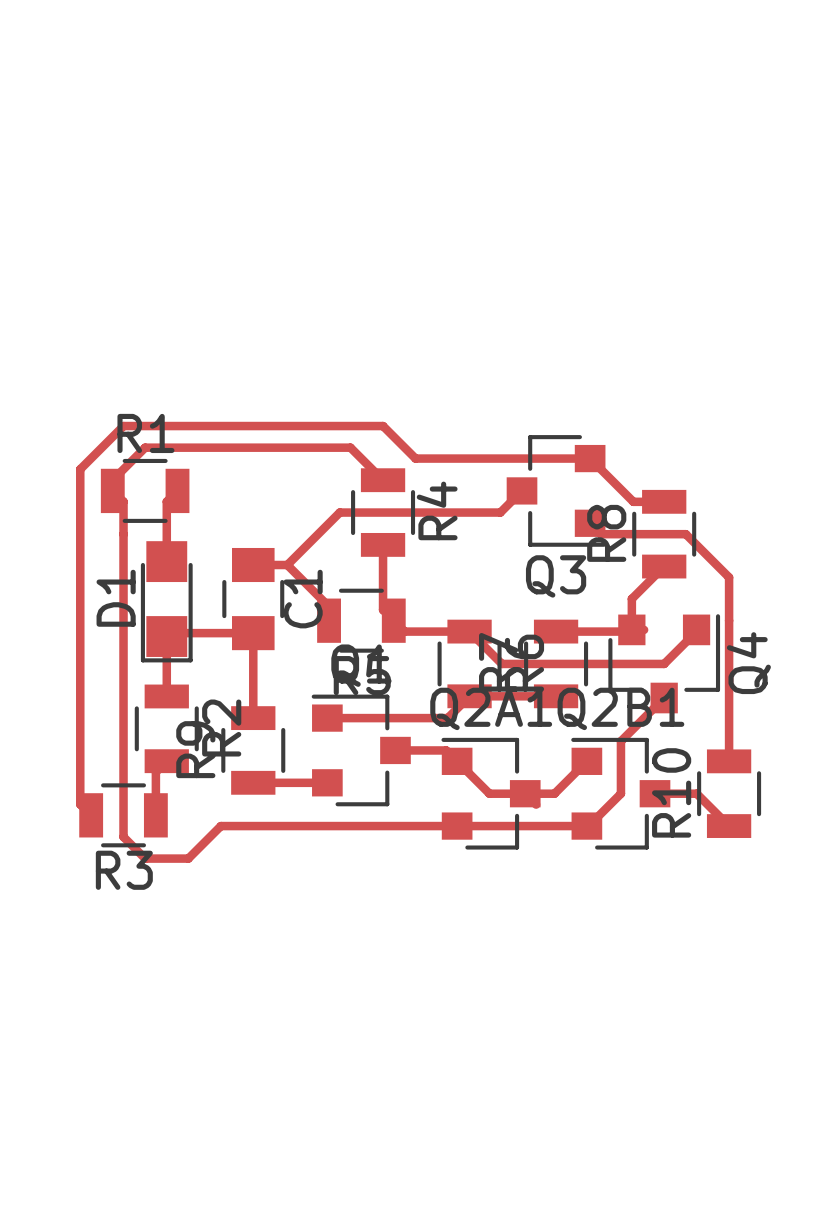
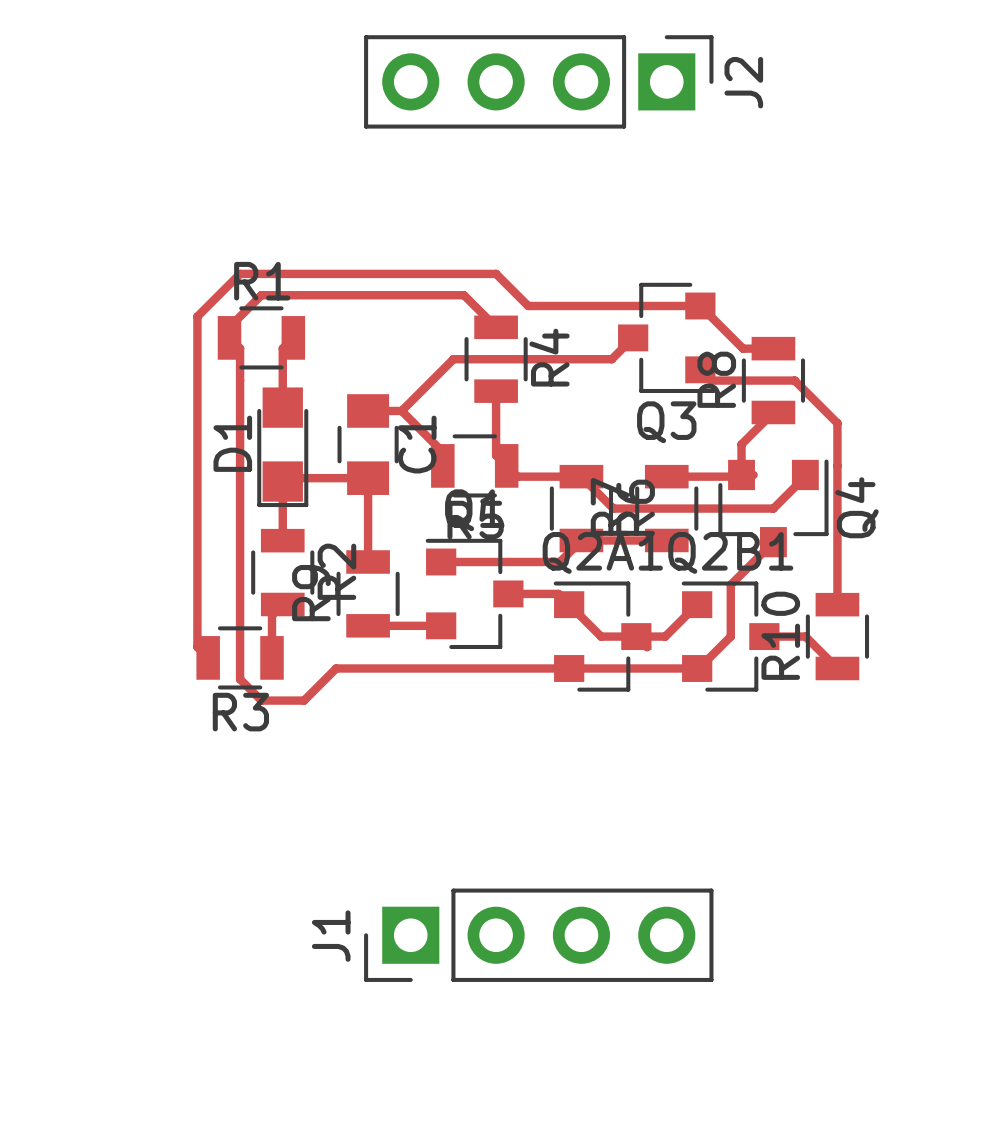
J2: none -> (538, 81)
J1: none -> (538, 935)

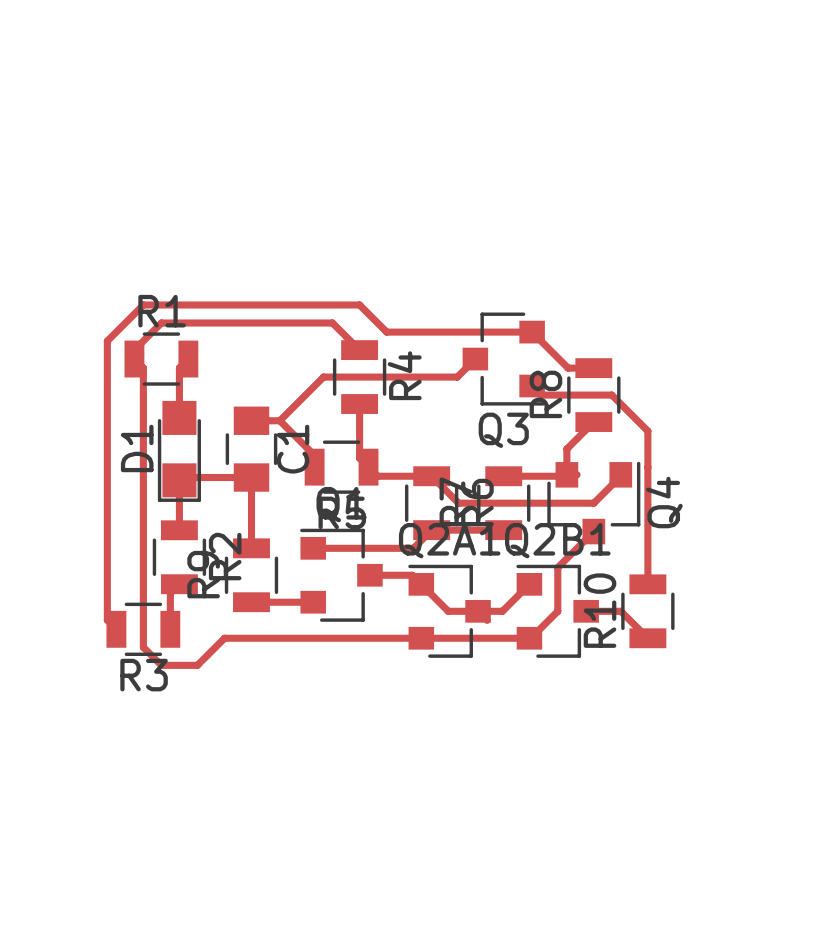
J2: (538, 81) -> none
J1: (538, 935) -> none

